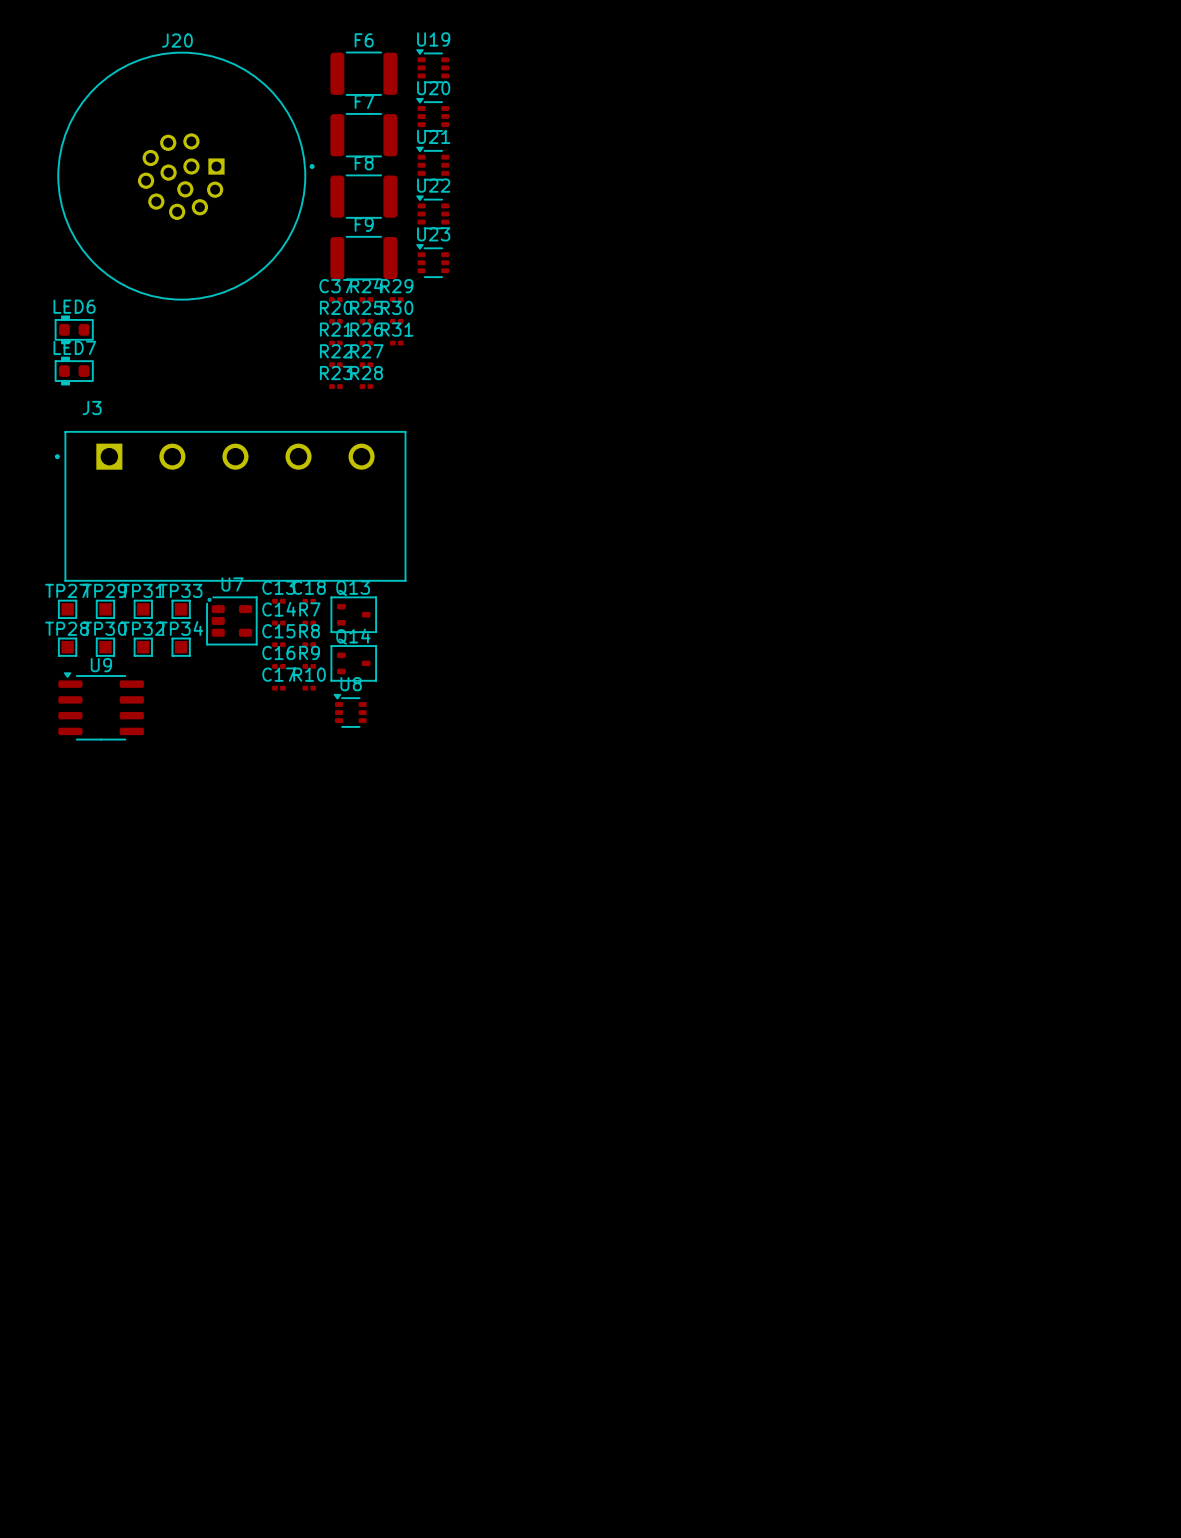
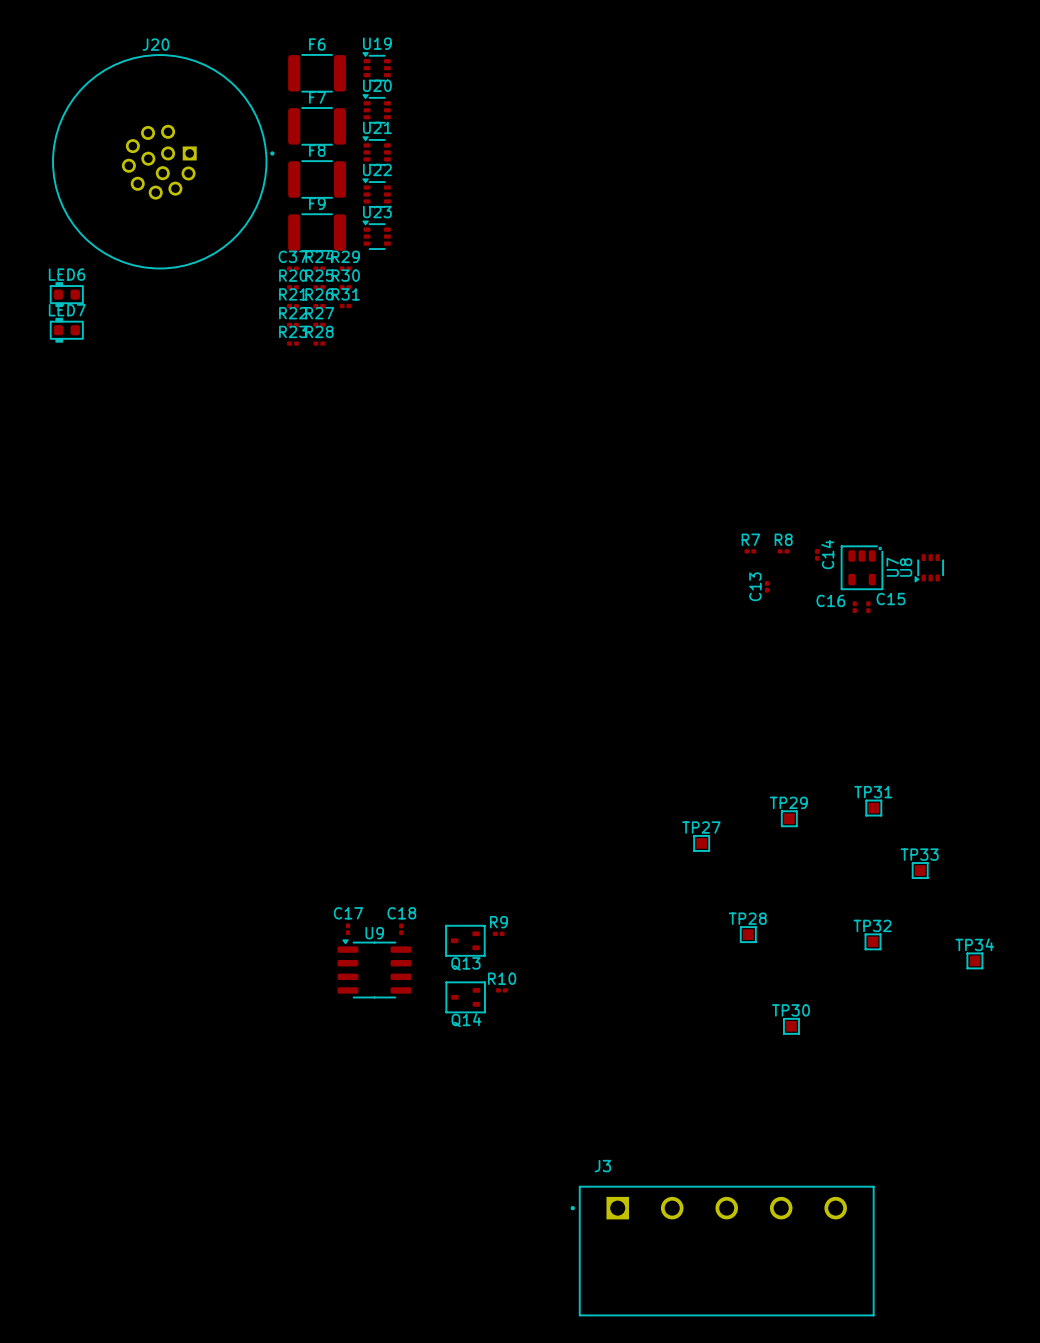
J3 position: (230, 506) -> (722, 1251)
C13 rotation: 0° (278, 601) -> 90° clockwise (767, 586)
C13 position: (278, 601) -> (767, 586)
C18 rotation: 0° (309, 601) -> 90° clockwise (401, 929)
C18 position: (309, 601) -> (401, 929)
TP27 position: (67, 609) -> (701, 843)
TP29 position: (105, 609) -> (789, 818)
TP31 position: (143, 609) -> (873, 808)
TP33 position: (181, 609) -> (920, 870)
Q13 rotation: 0° (353, 614) -> 180° (465, 940)
Q13 position: (353, 614) -> (465, 940)
U7 rotation: 0° (231, 620) -> 90° clockwise (862, 567)
U7 position: (231, 620) -> (862, 567)
C14 rotation: 0° (278, 622) -> 90° clockwise (817, 554)
C14 position: (278, 622) -> (817, 554)
R7 position: (309, 622) -> (750, 551)
C15 rotation: 0° (278, 644) -> 90° clockwise (868, 607)
C15 position: (278, 644) -> (868, 607)
R8 position: (309, 644) -> (783, 551)
TP28 position: (67, 647) -> (748, 934)
TP30 position: (105, 647) -> (791, 1026)
TP32 position: (143, 647) -> (872, 941)
TP34 position: (181, 647) -> (974, 960)
C16 name position: C16 (278, 652) -> C16 (830, 600)
Q14 rotation: 0° (353, 663) -> 180° (465, 997)
Q14 position: (353, 663) -> (465, 997)
C16 rotation: 0° (278, 666) -> 90° clockwise (854, 607)
C16 position: (278, 666) -> (854, 607)
R9 position: (309, 666) -> (498, 933)
C17 rotation: 0° (278, 688) -> 90° clockwise (347, 929)
C17 position: (278, 688) -> (347, 929)
R10 position: (309, 688) -> (501, 990)
U9 position: (101, 706) -> (374, 968)
U8 rotation: 0° (350, 710) -> 90° counterclockwise (929, 568)
U8 position: (350, 710) -> (929, 568)

